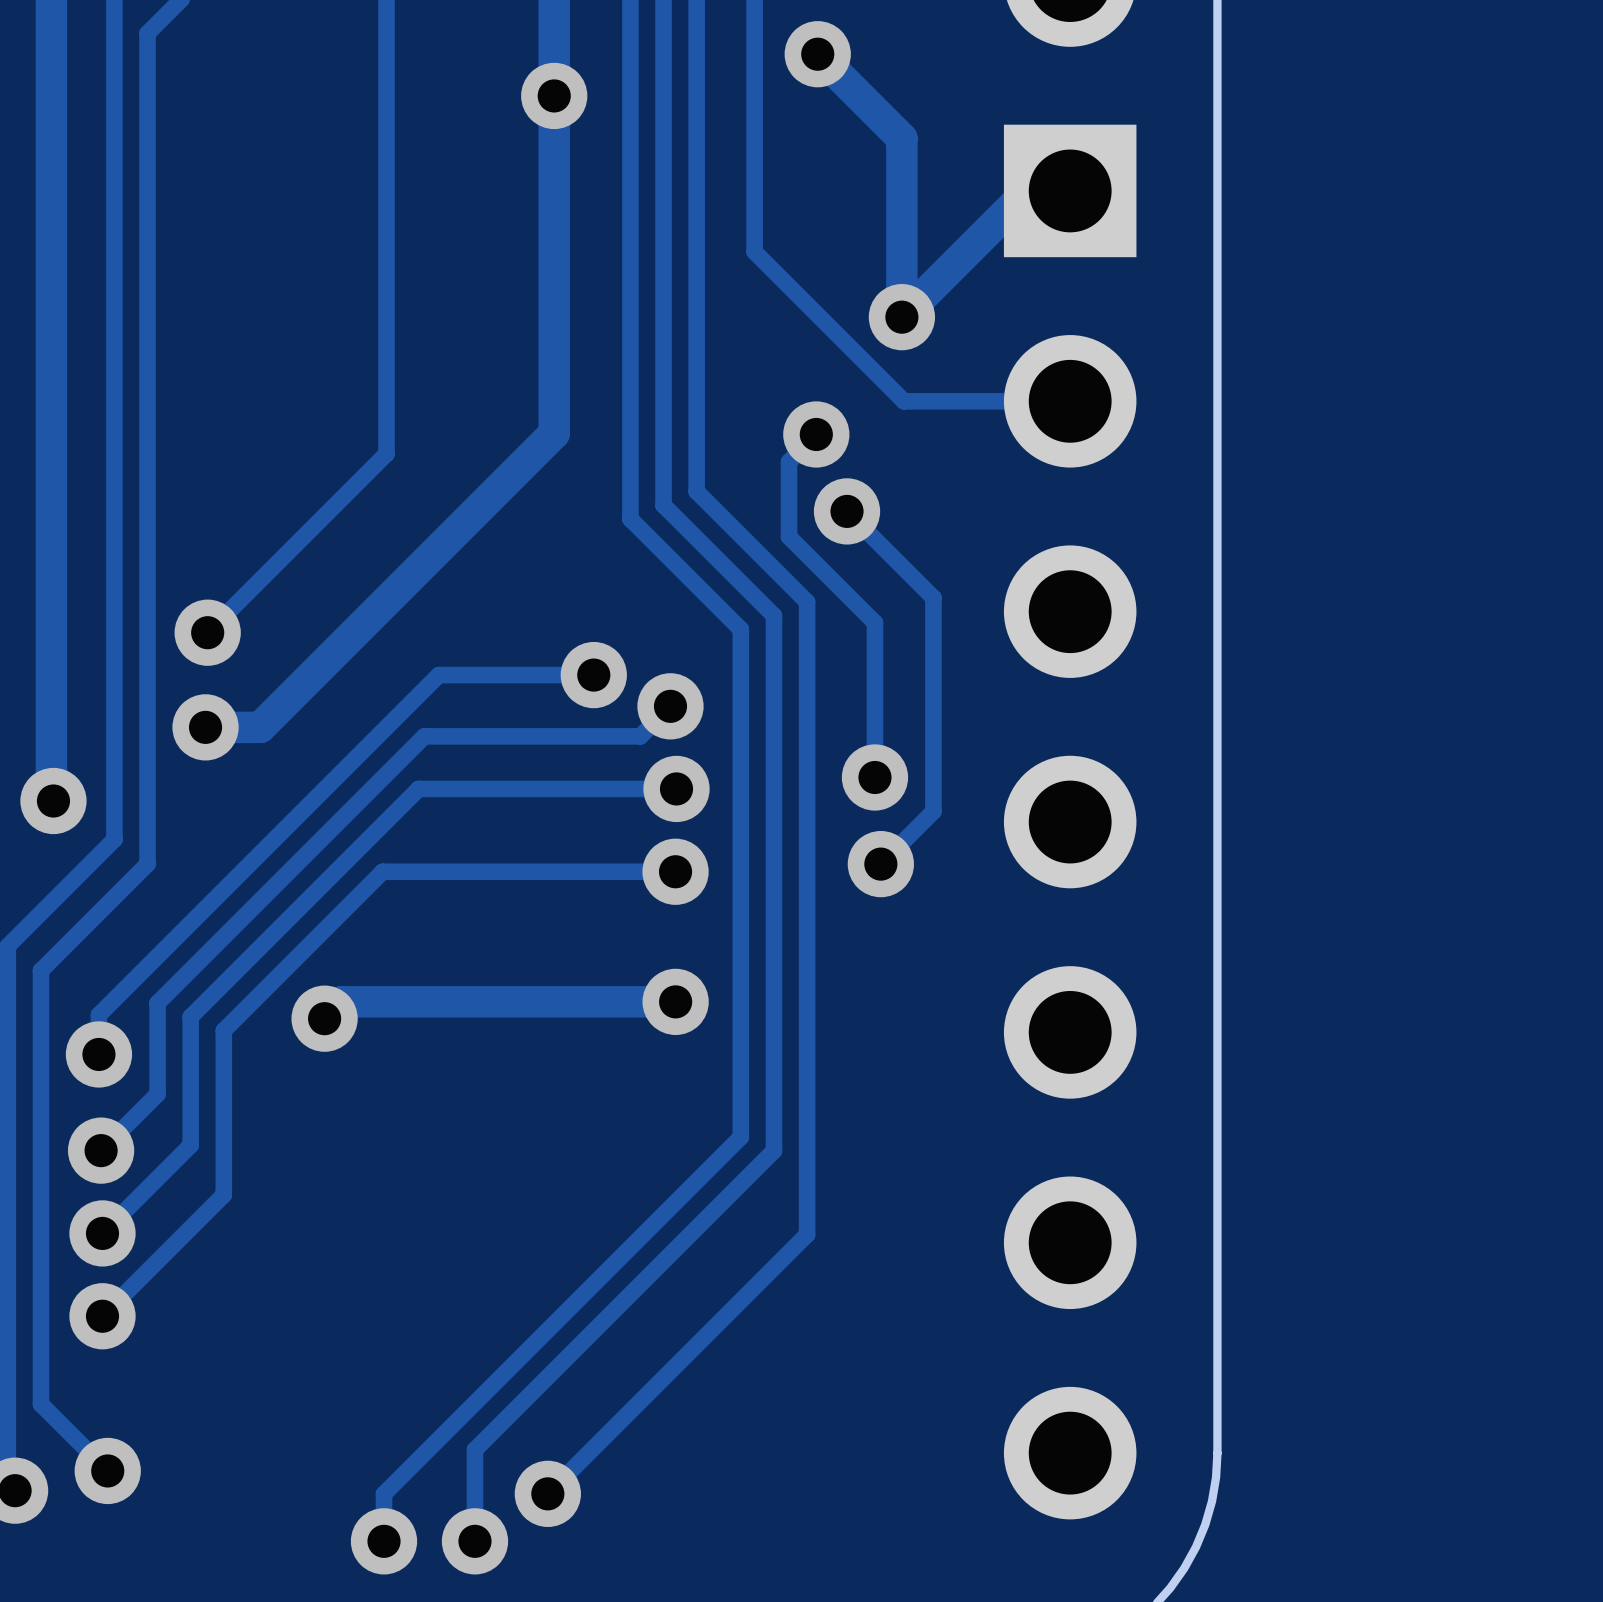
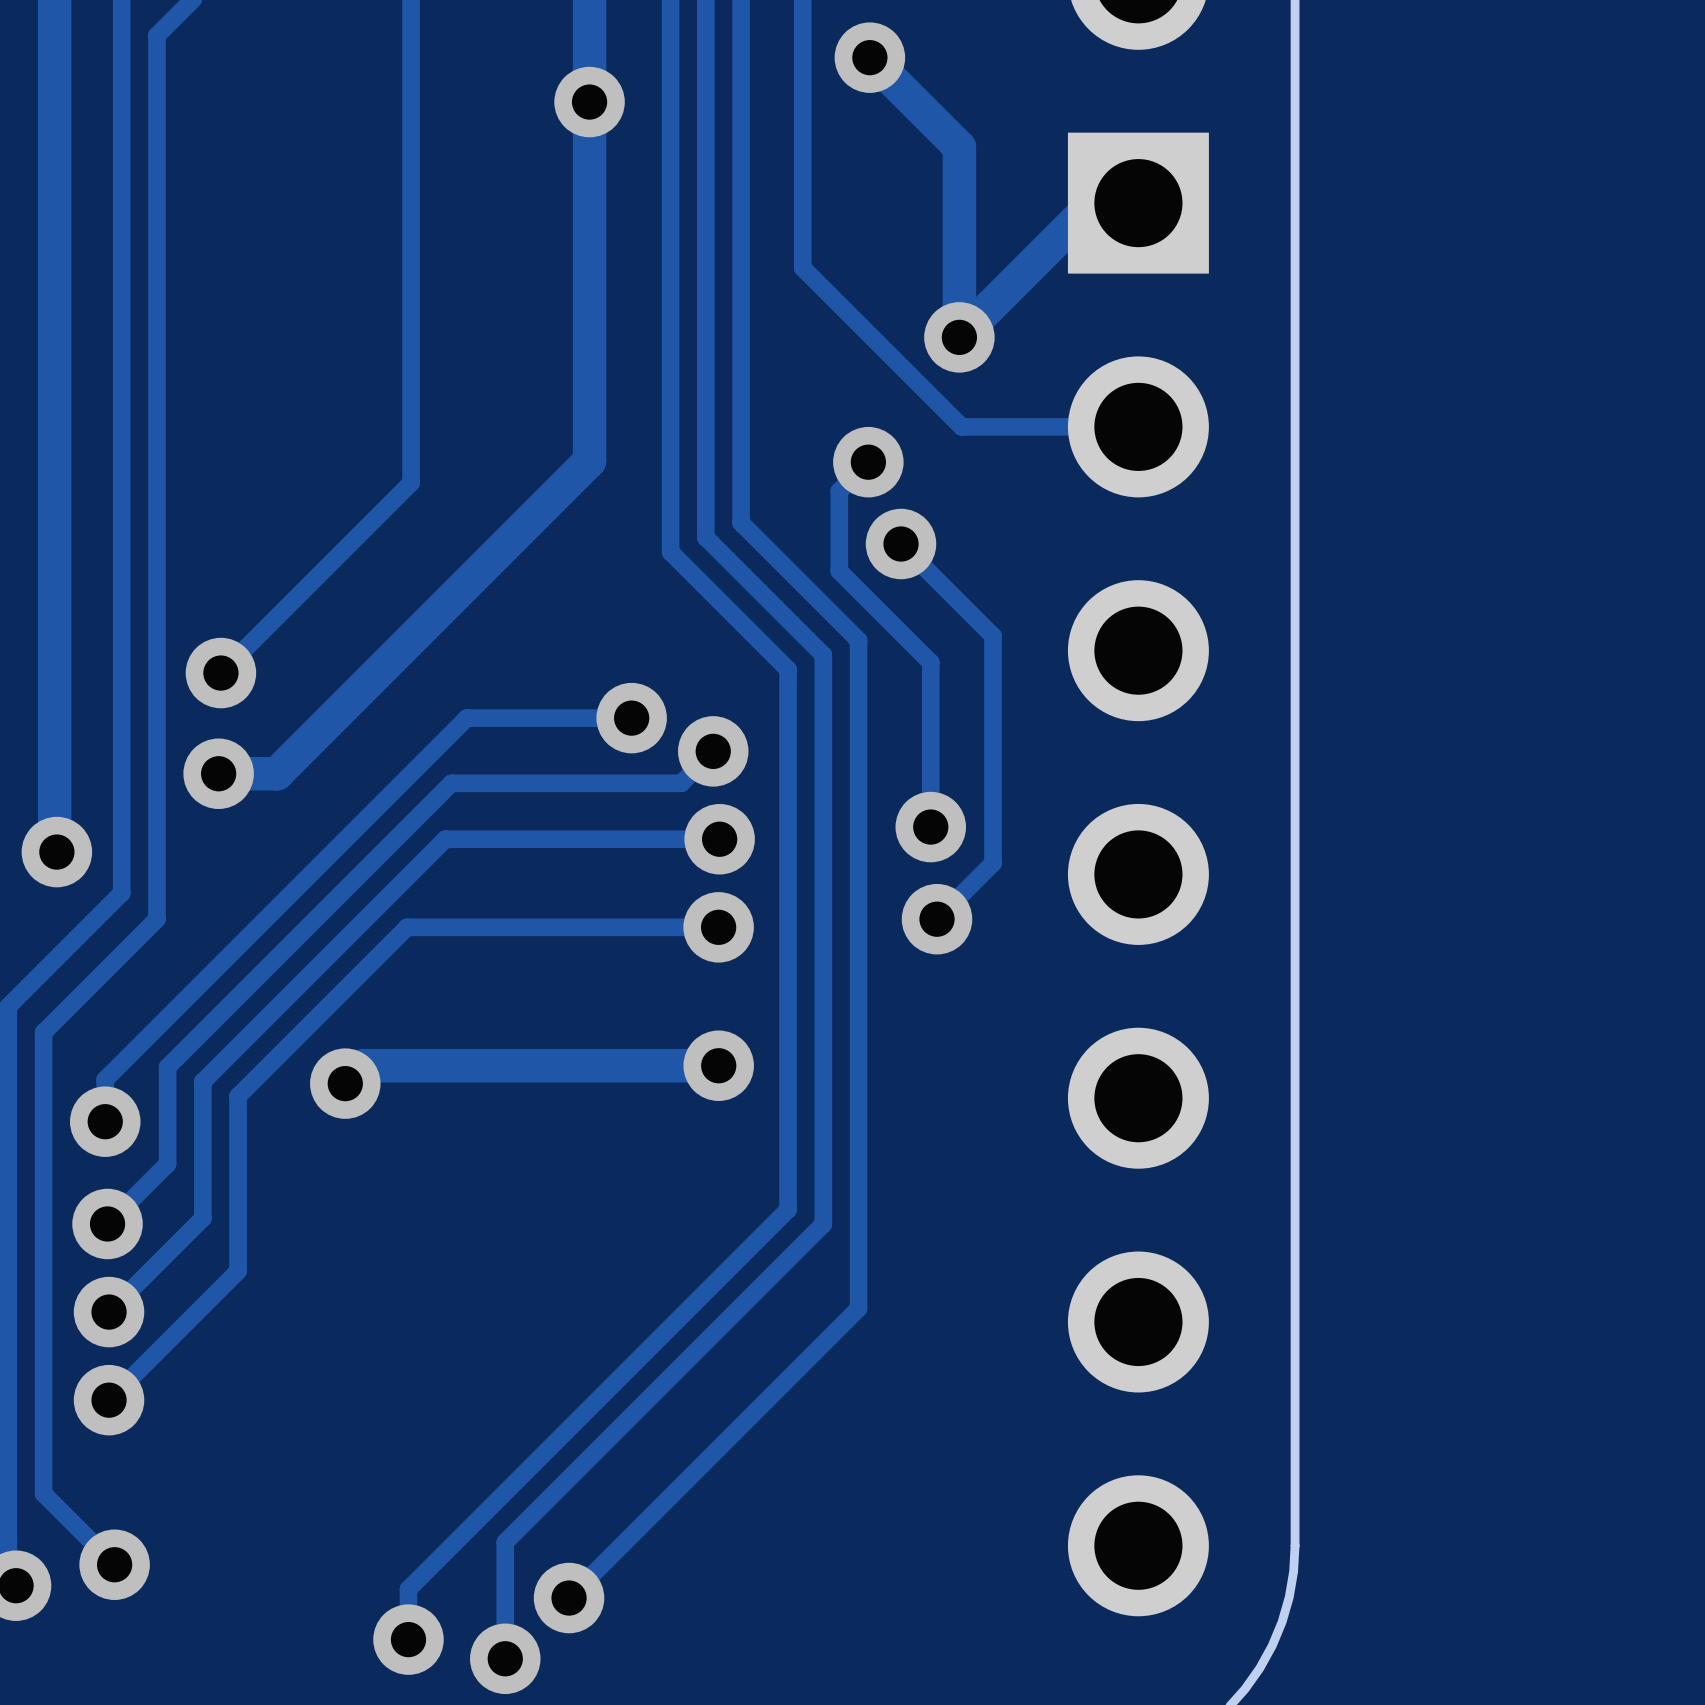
track: (807, 1230) (807, 1234) (547, 1493) -> (858, 1308) (569, 1598)
via position: (547, 1493) -> (569, 1598)
via position: (474, 1541) -> (505, 1658)

